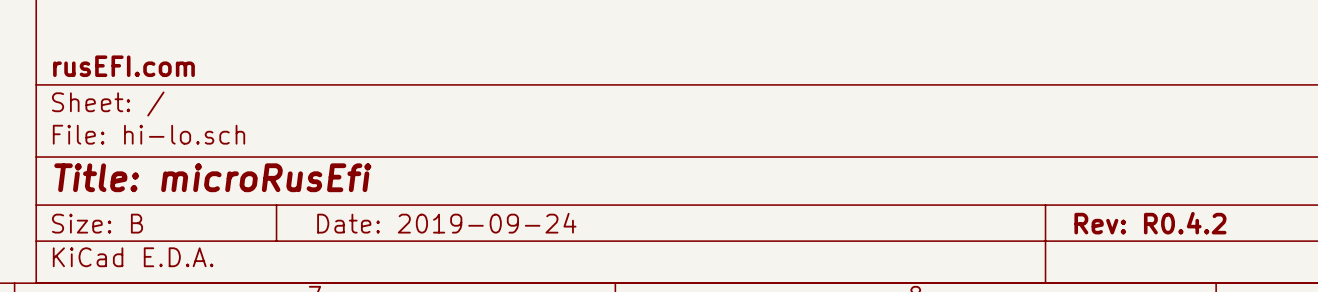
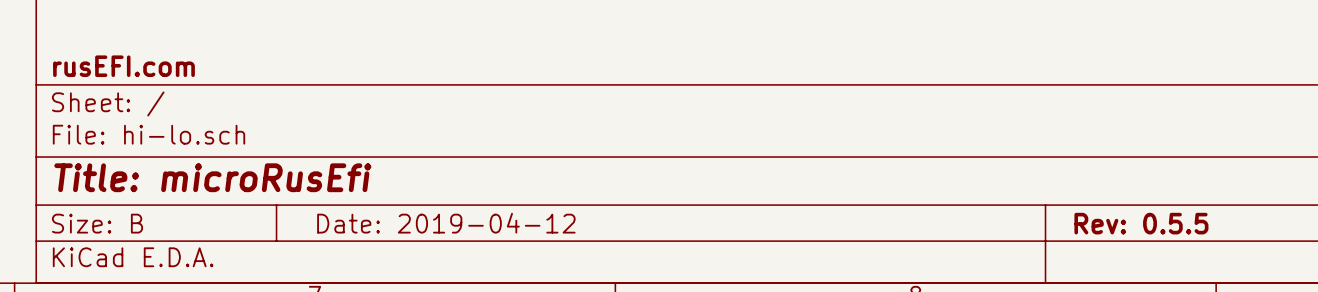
title block: Date: 2019-09-24 (446, 223) -> Date: 2019-04-12 (446, 223)
title block: Rev: R0.4.2 (1150, 223) -> Rev: 0.5.5 (1141, 223)

